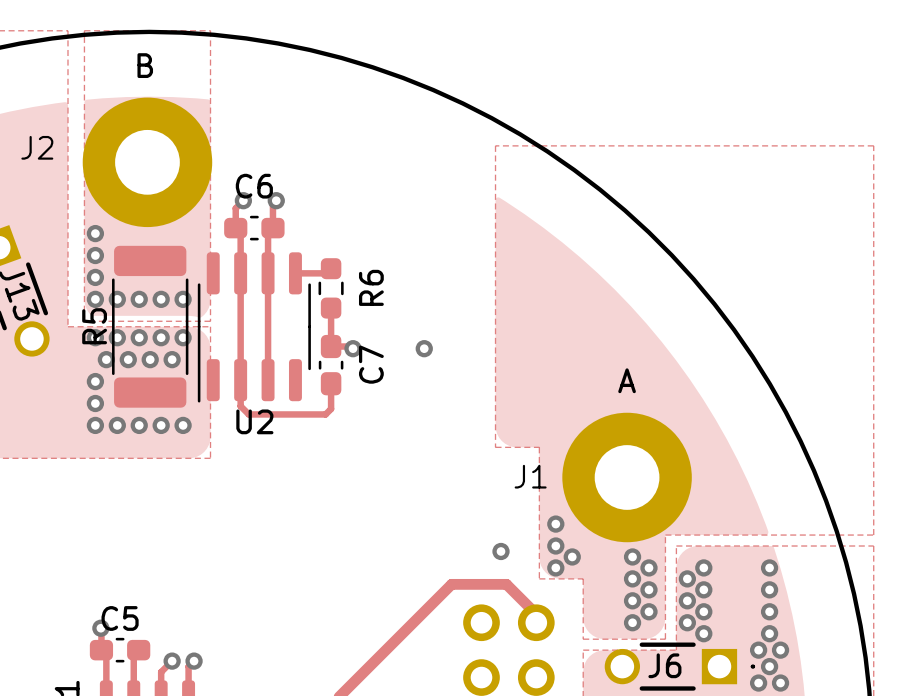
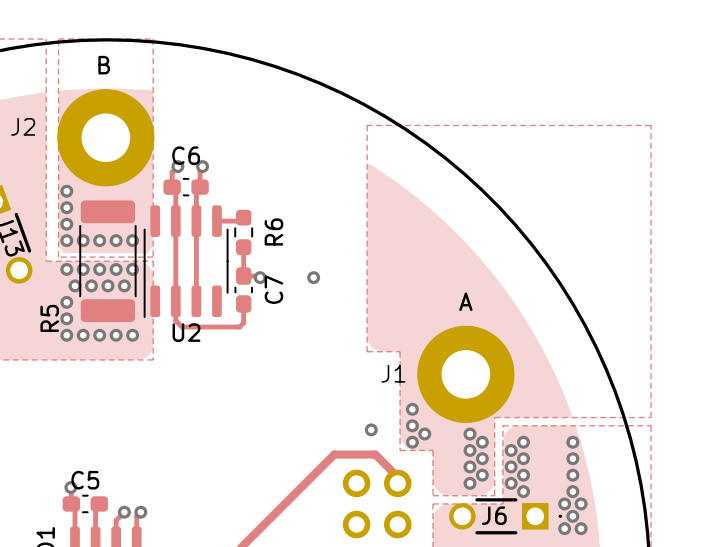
R5 name position: R5 (94, 326) -> R5 (49, 318)

